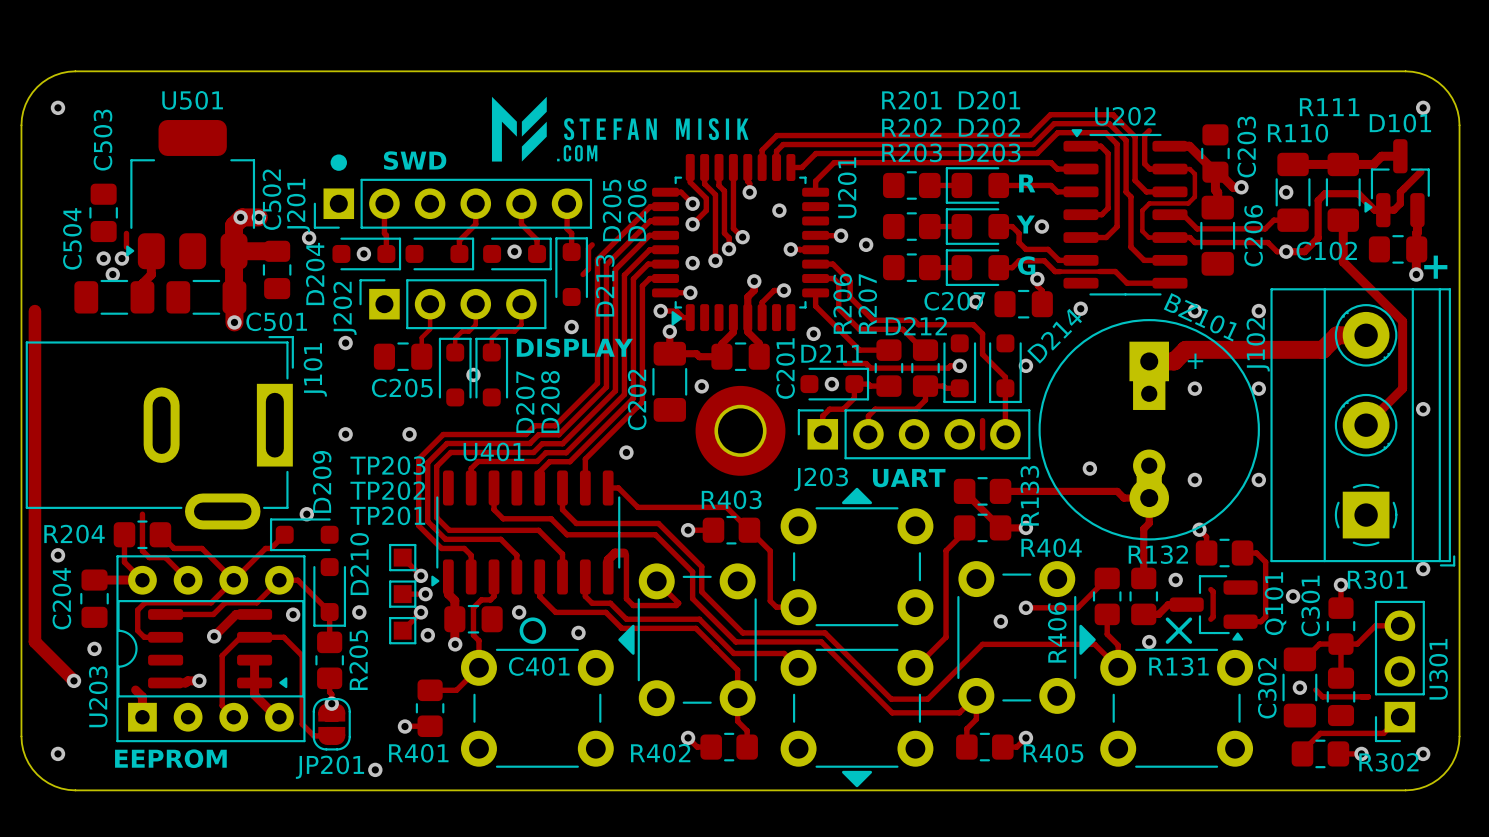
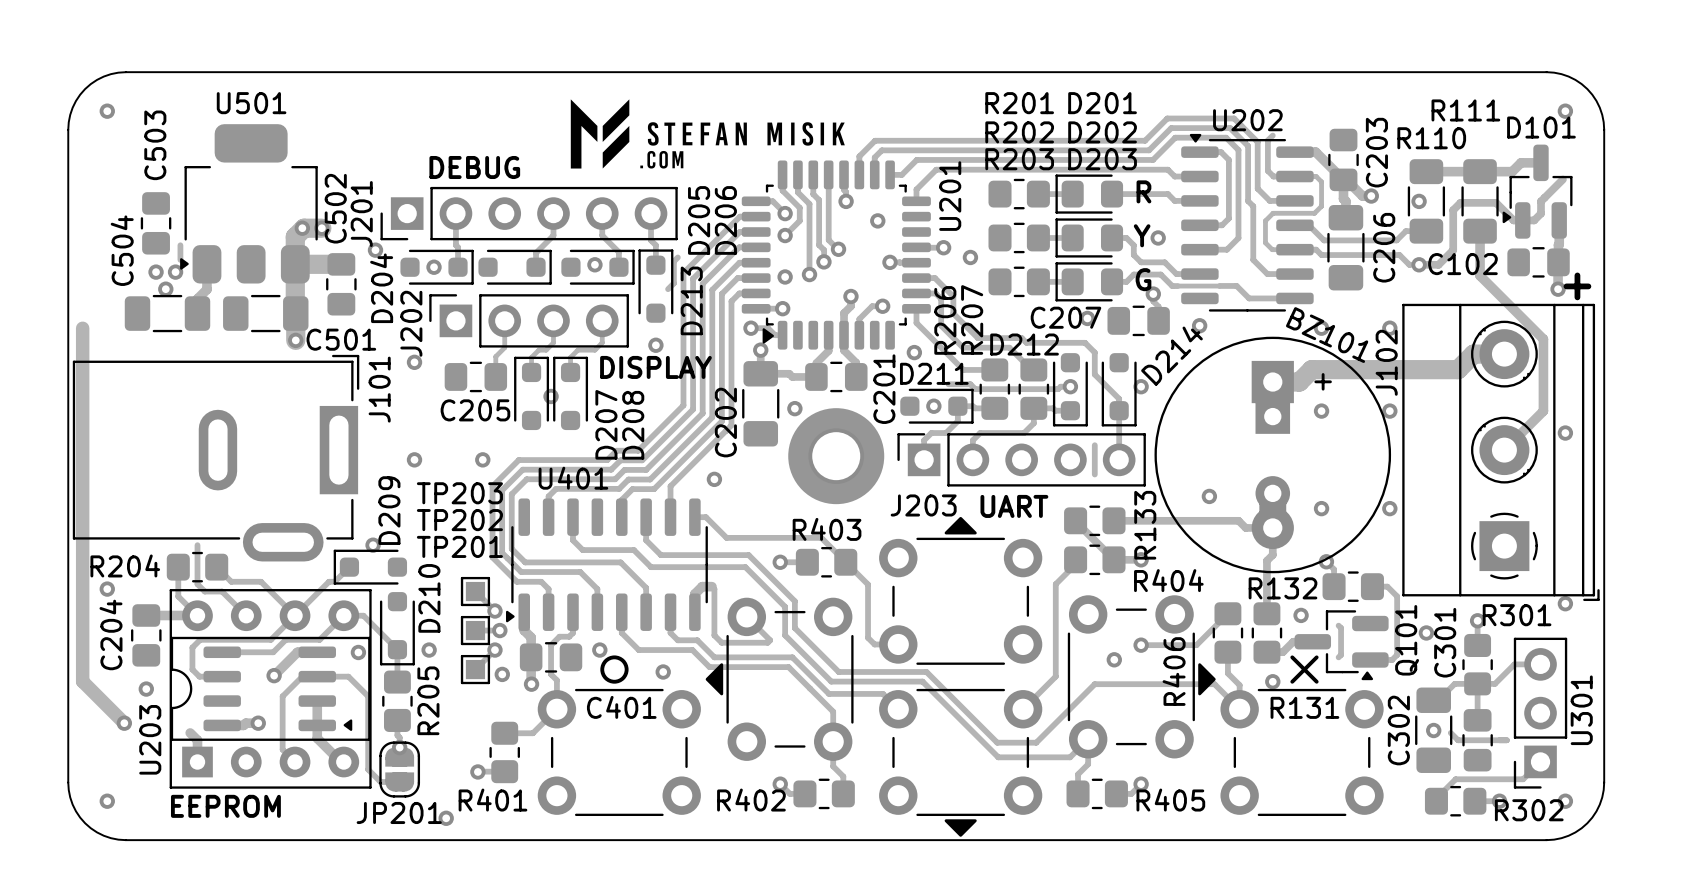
drawing: [330, 154, 347, 171] -> none
text: none -> DEBUG (474, 167)
text: SWD (415, 160) -> none

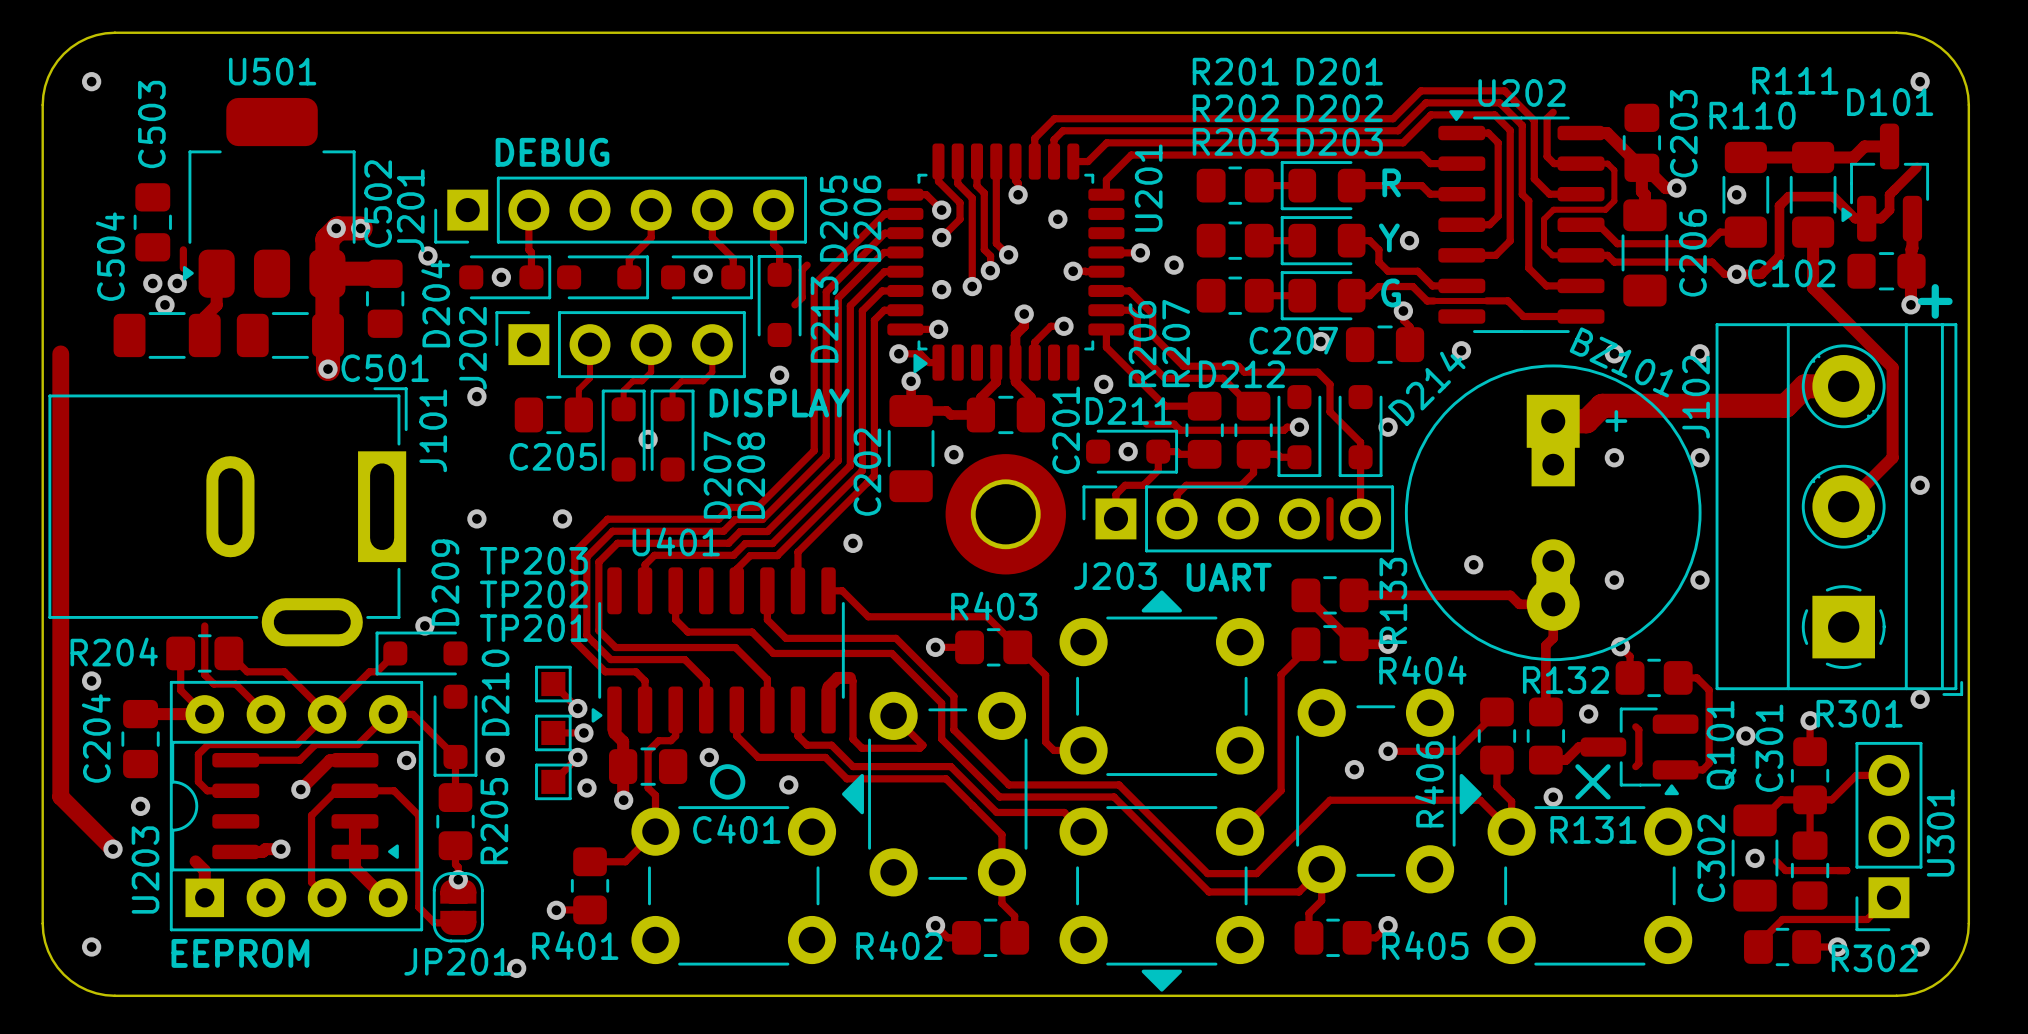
drawing: [570, 99, 845, 169] -> none

